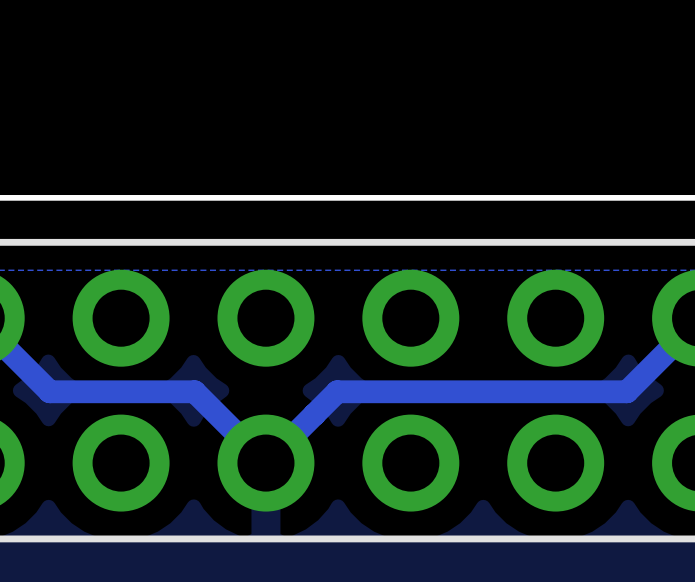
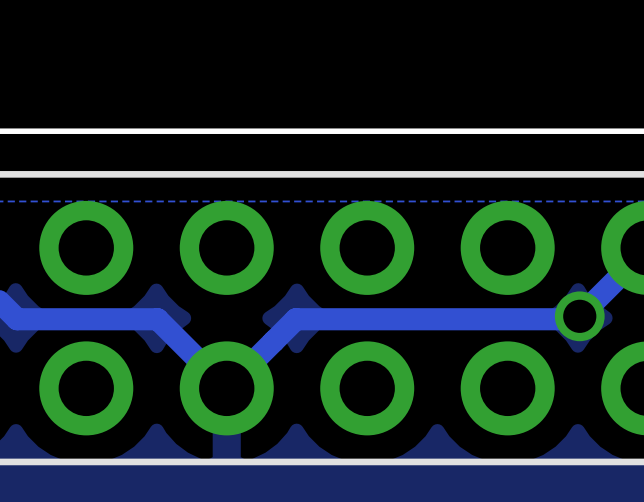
via: none -> (579, 316)

